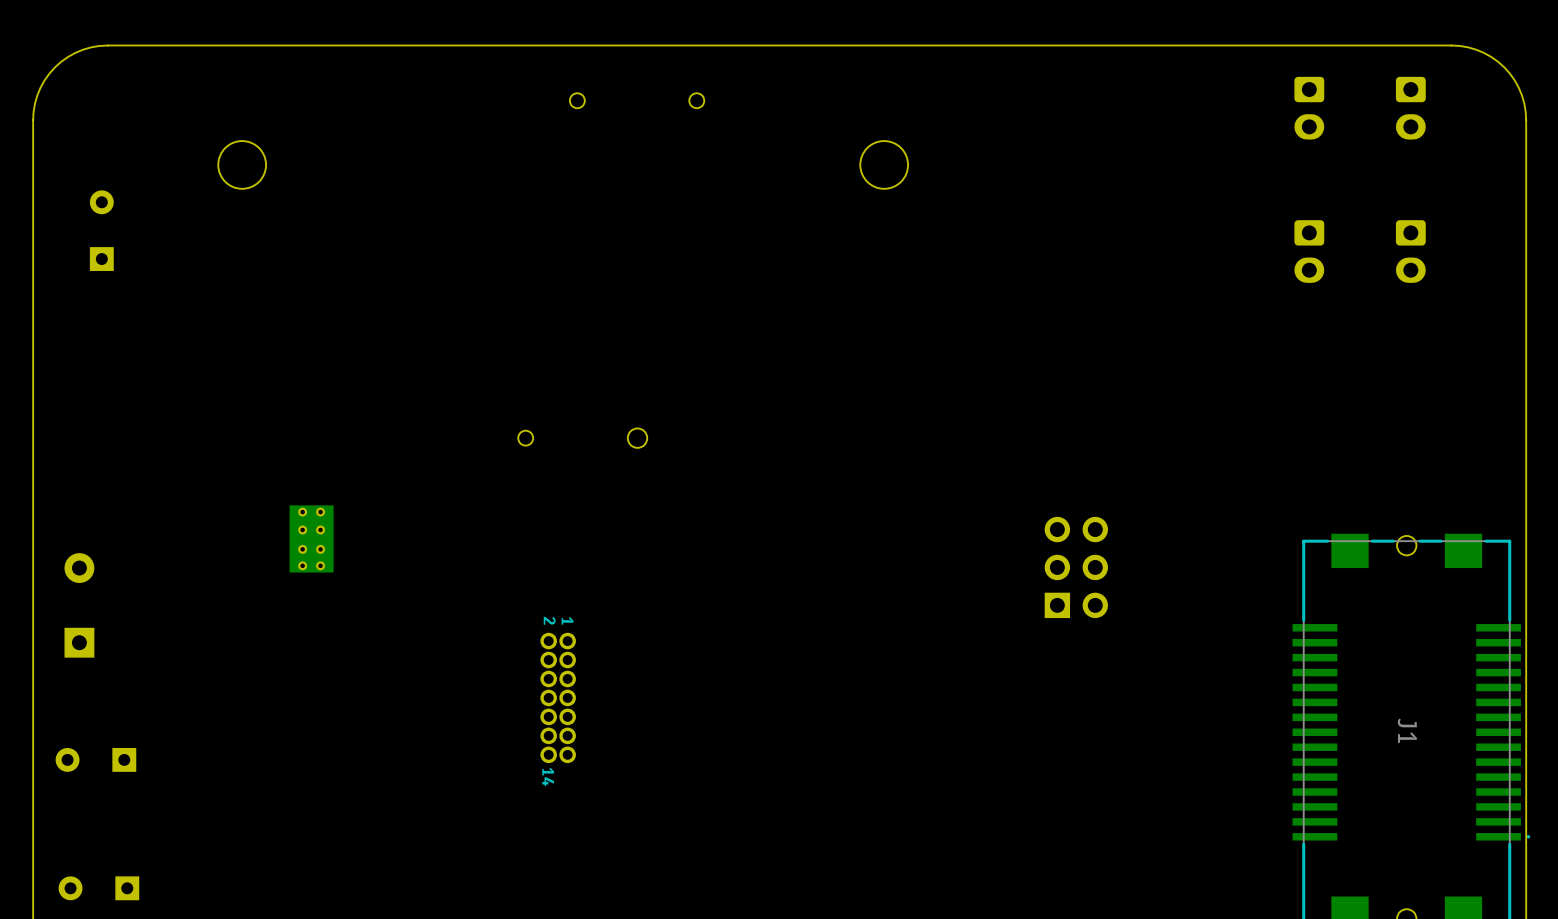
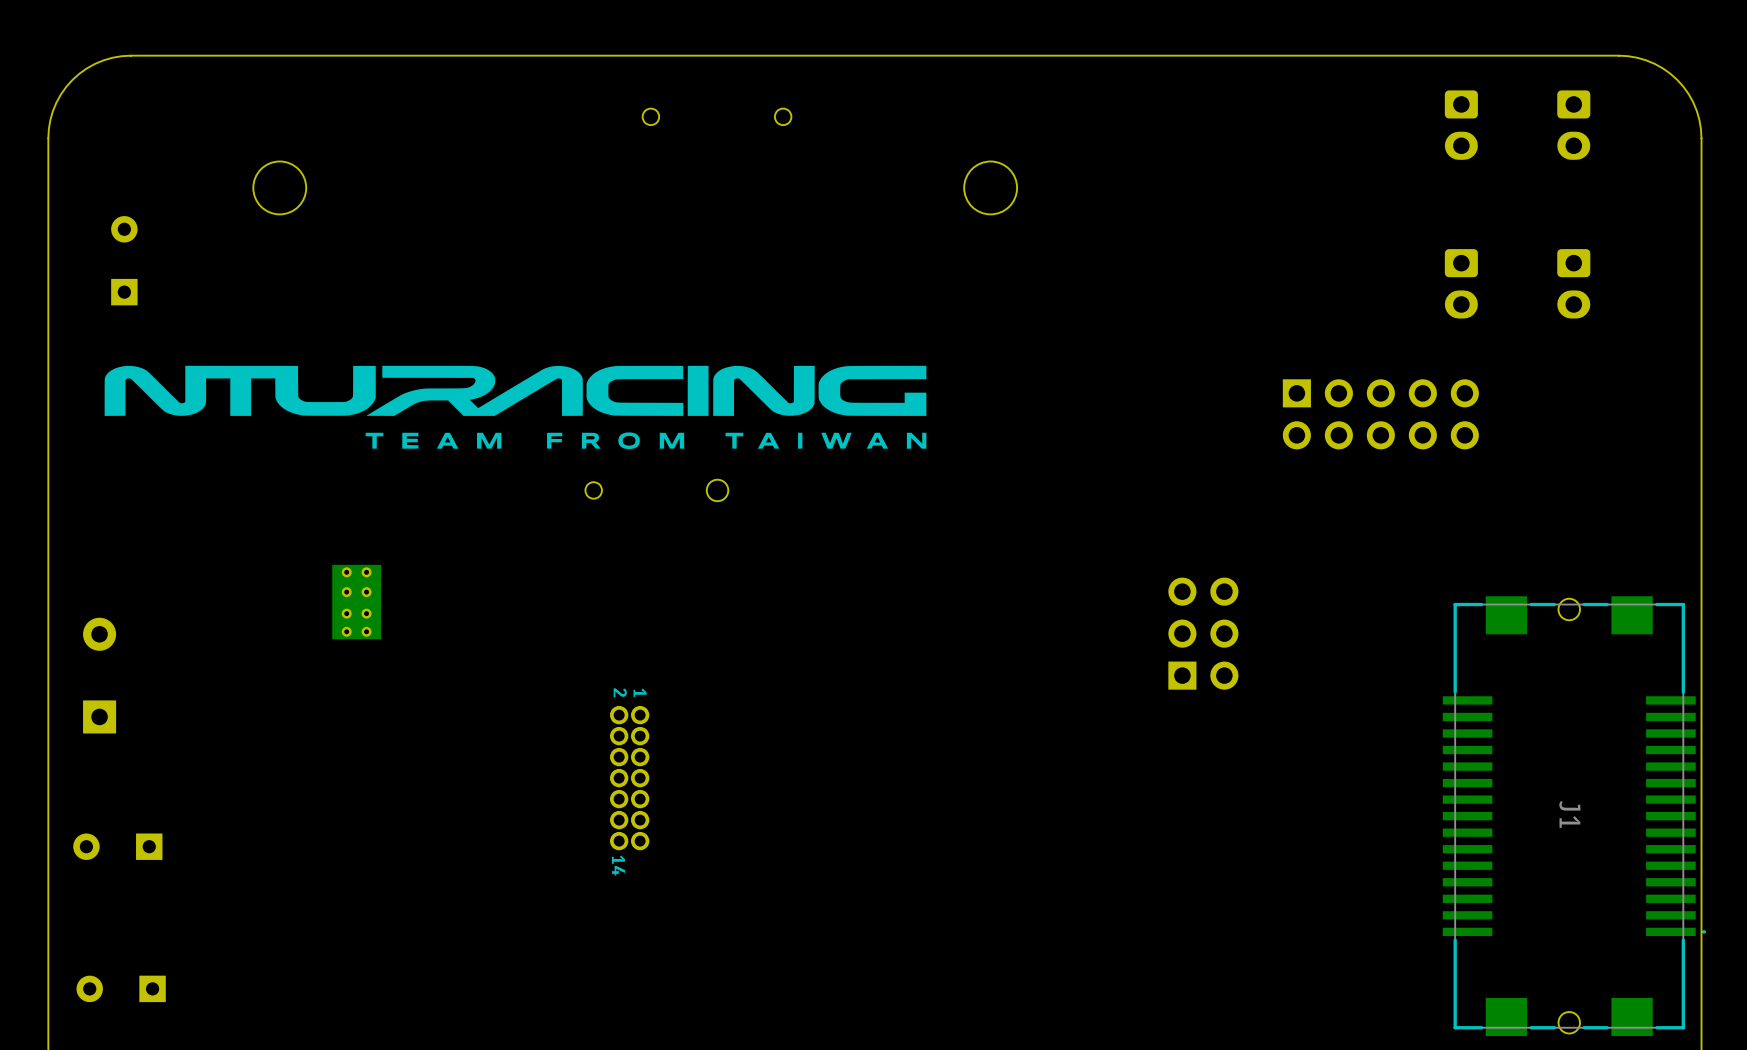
drawing: none -> [104, 365, 927, 450]
part: none -> (1380, 414)

